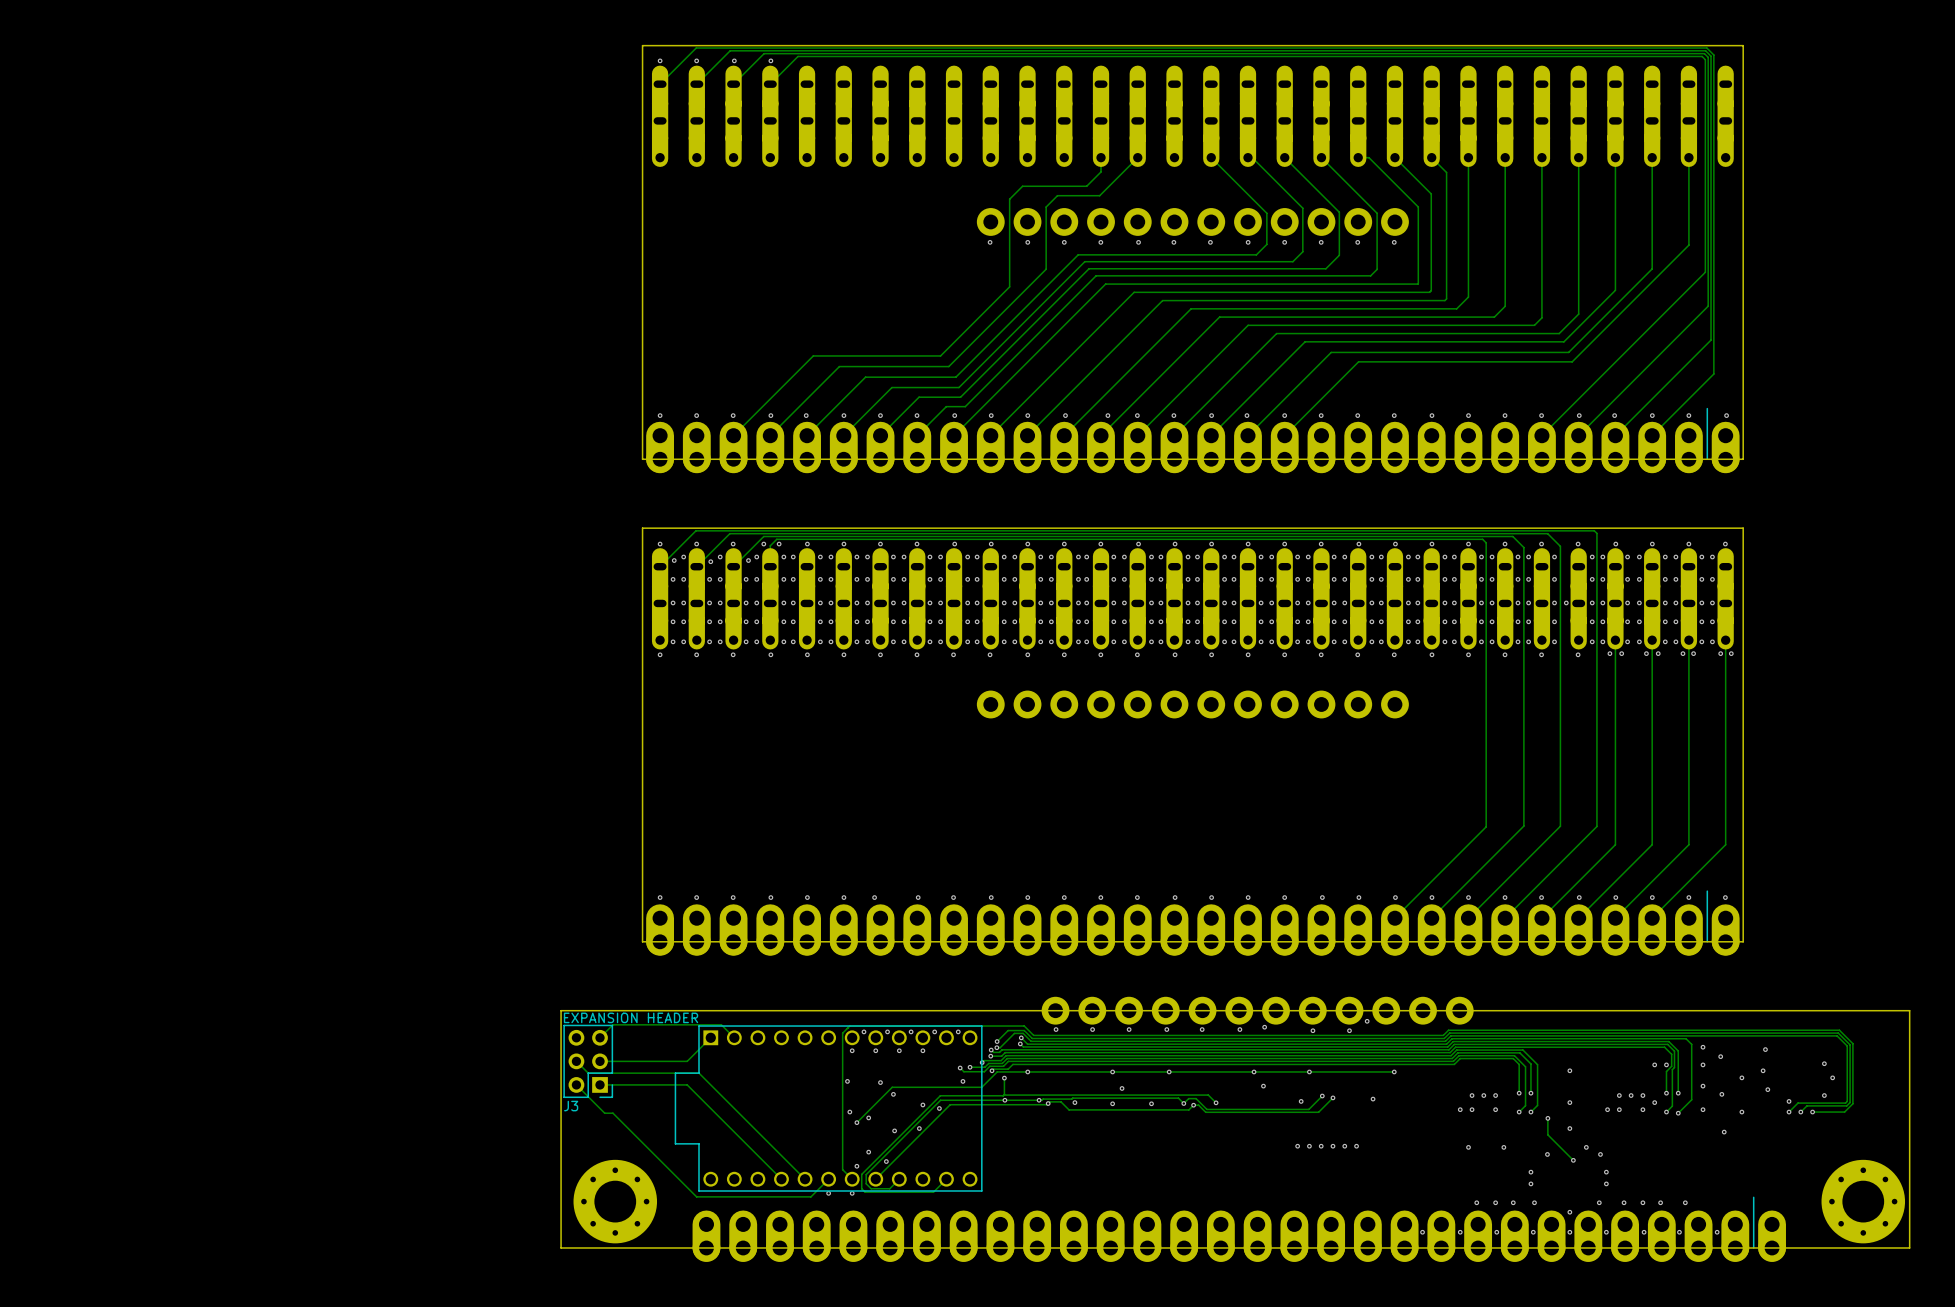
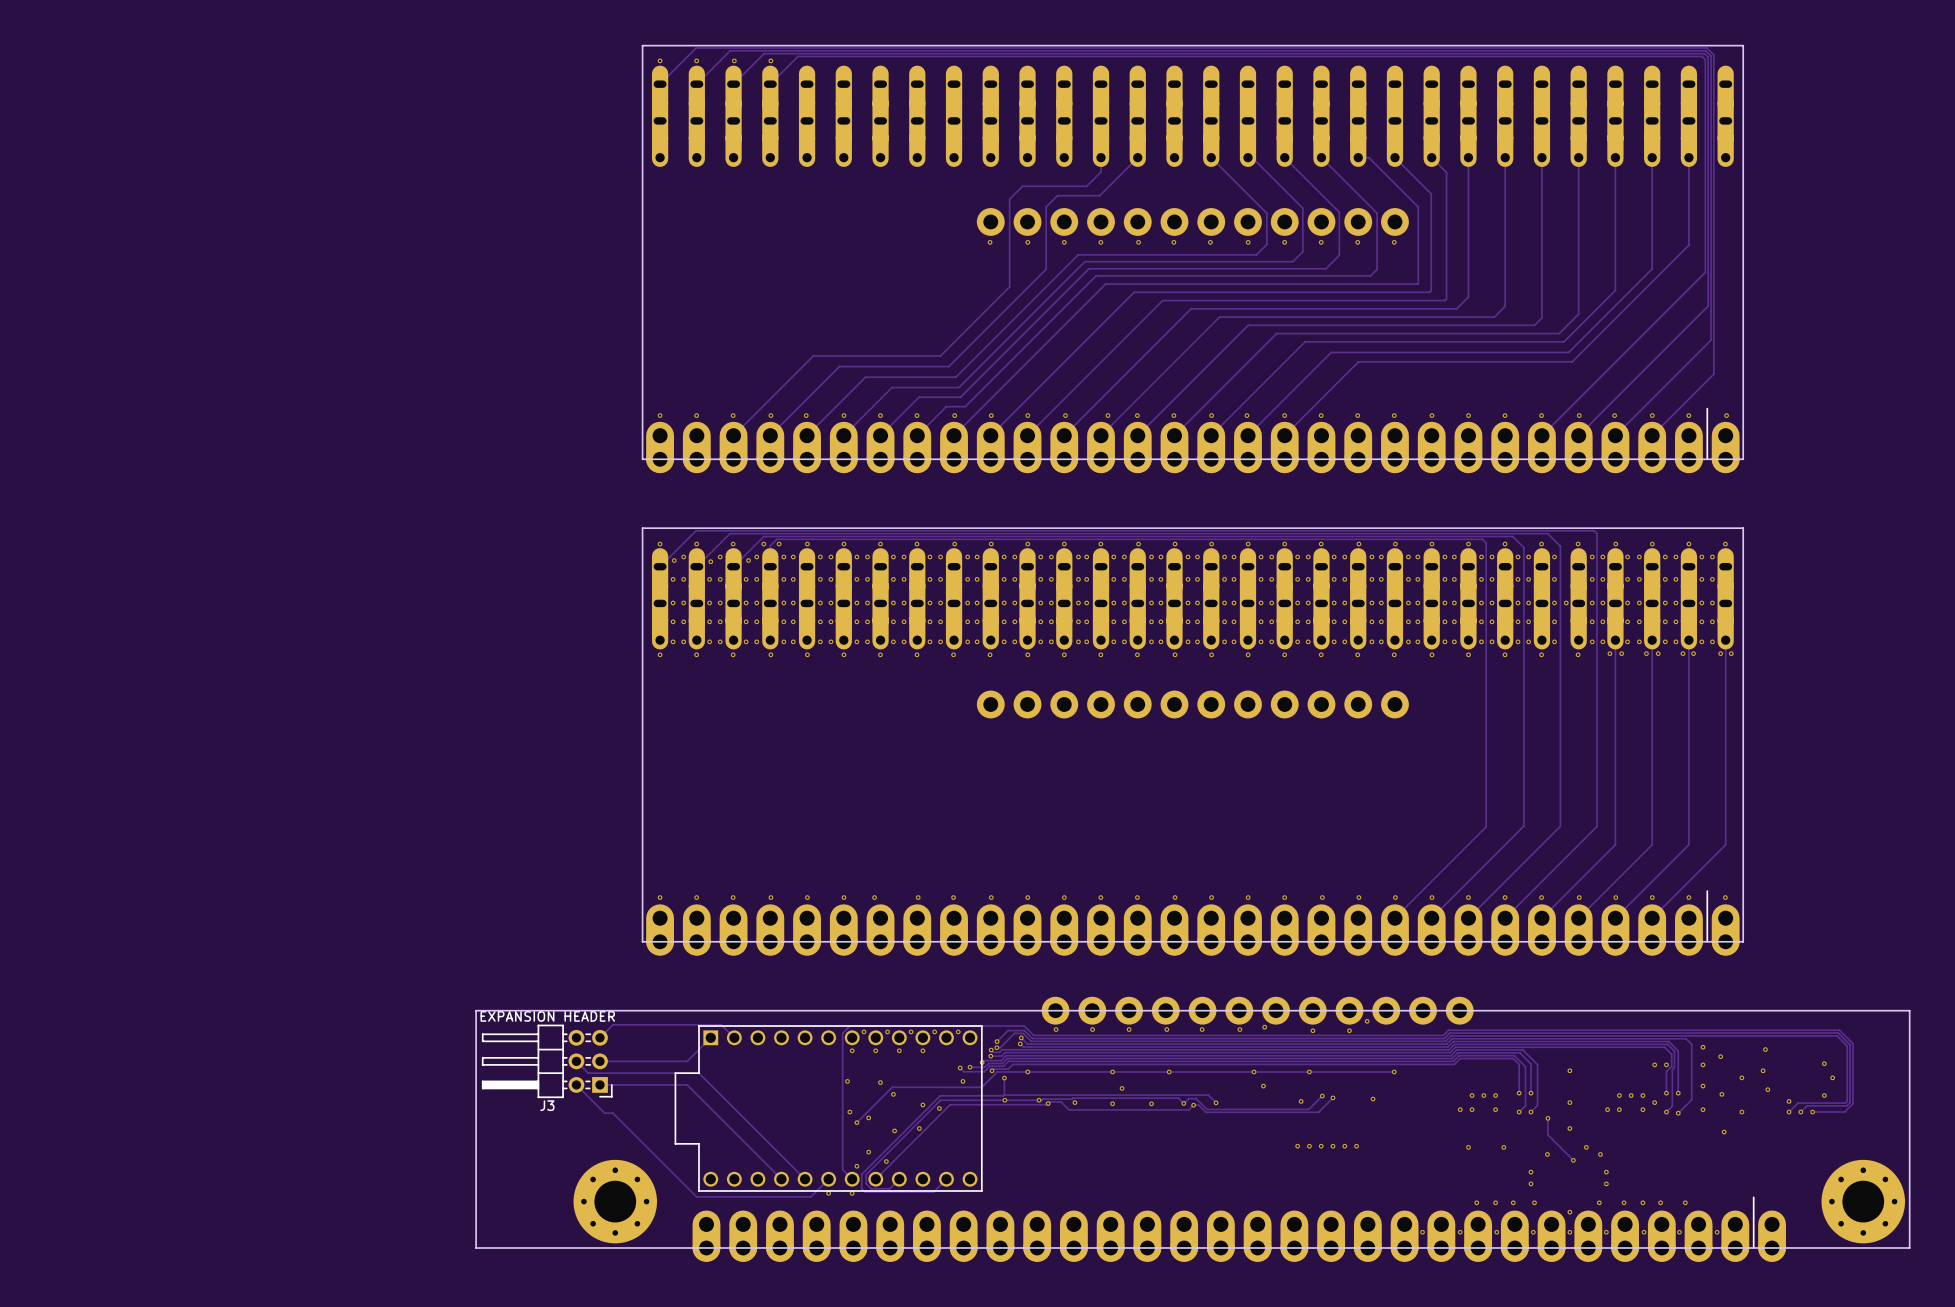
board edge: (561, 1010) (561, 1247) -> (561, 1010) (476, 1010) (476, 1247) (561, 1247)
J3 value position: EXPANSION HEADER (631, 1017) -> EXPANSION HEADER (547, 1016)
J3 footprint: [563, 1024, 613, 1098] -> [482, 1024, 613, 1098]

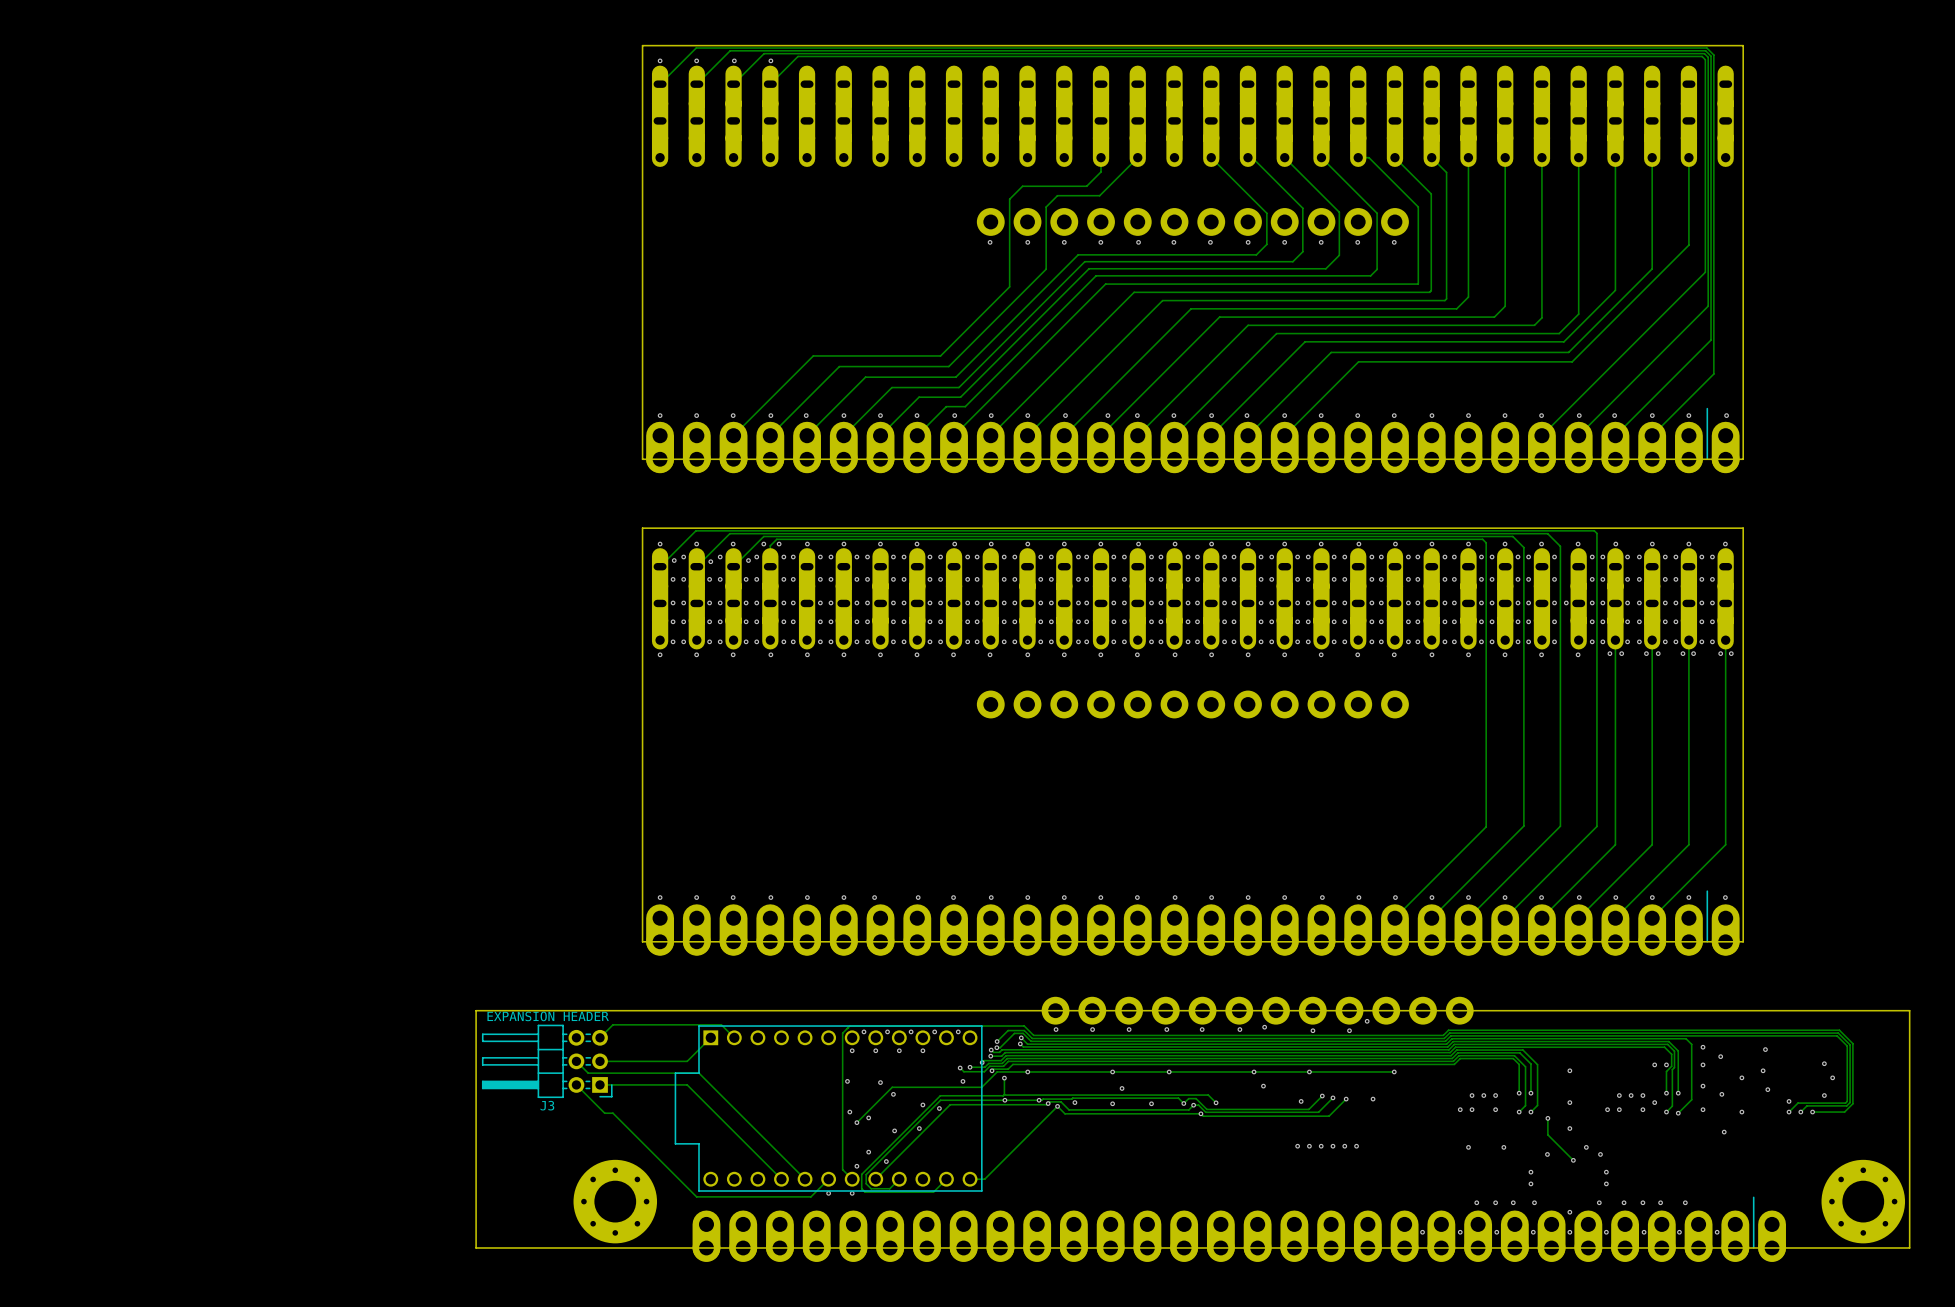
track: none -> (1346, 1099) (1329, 1116) (1064, 1113) (1057, 1106) (984, 1179) (970, 1179)
via: none -> (1346, 1099)
via: none -> (1057, 1106)
via: none -> (1200, 1113)

